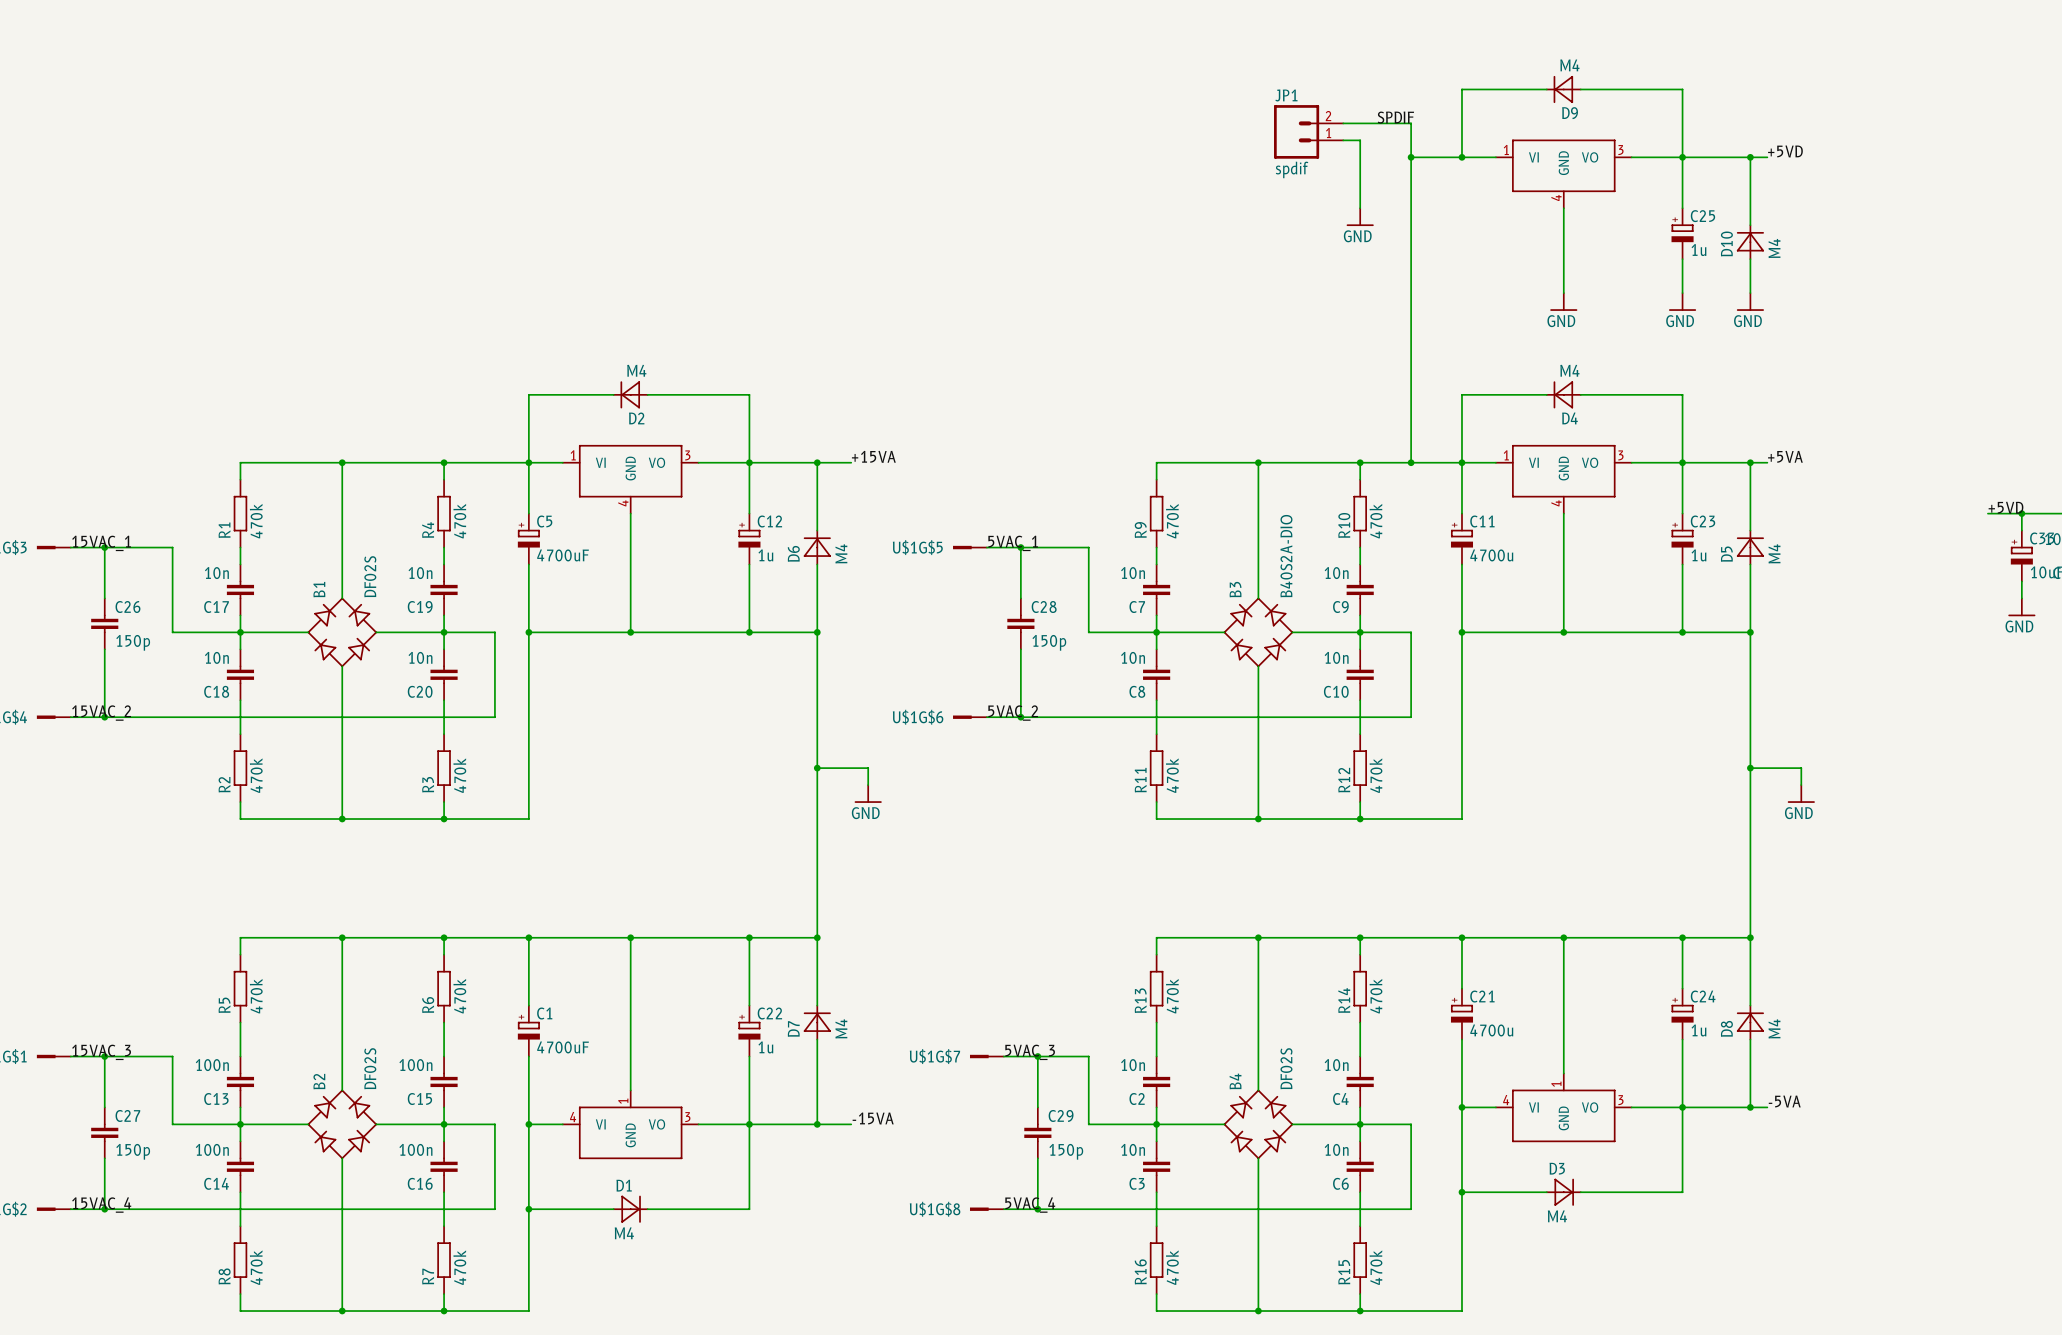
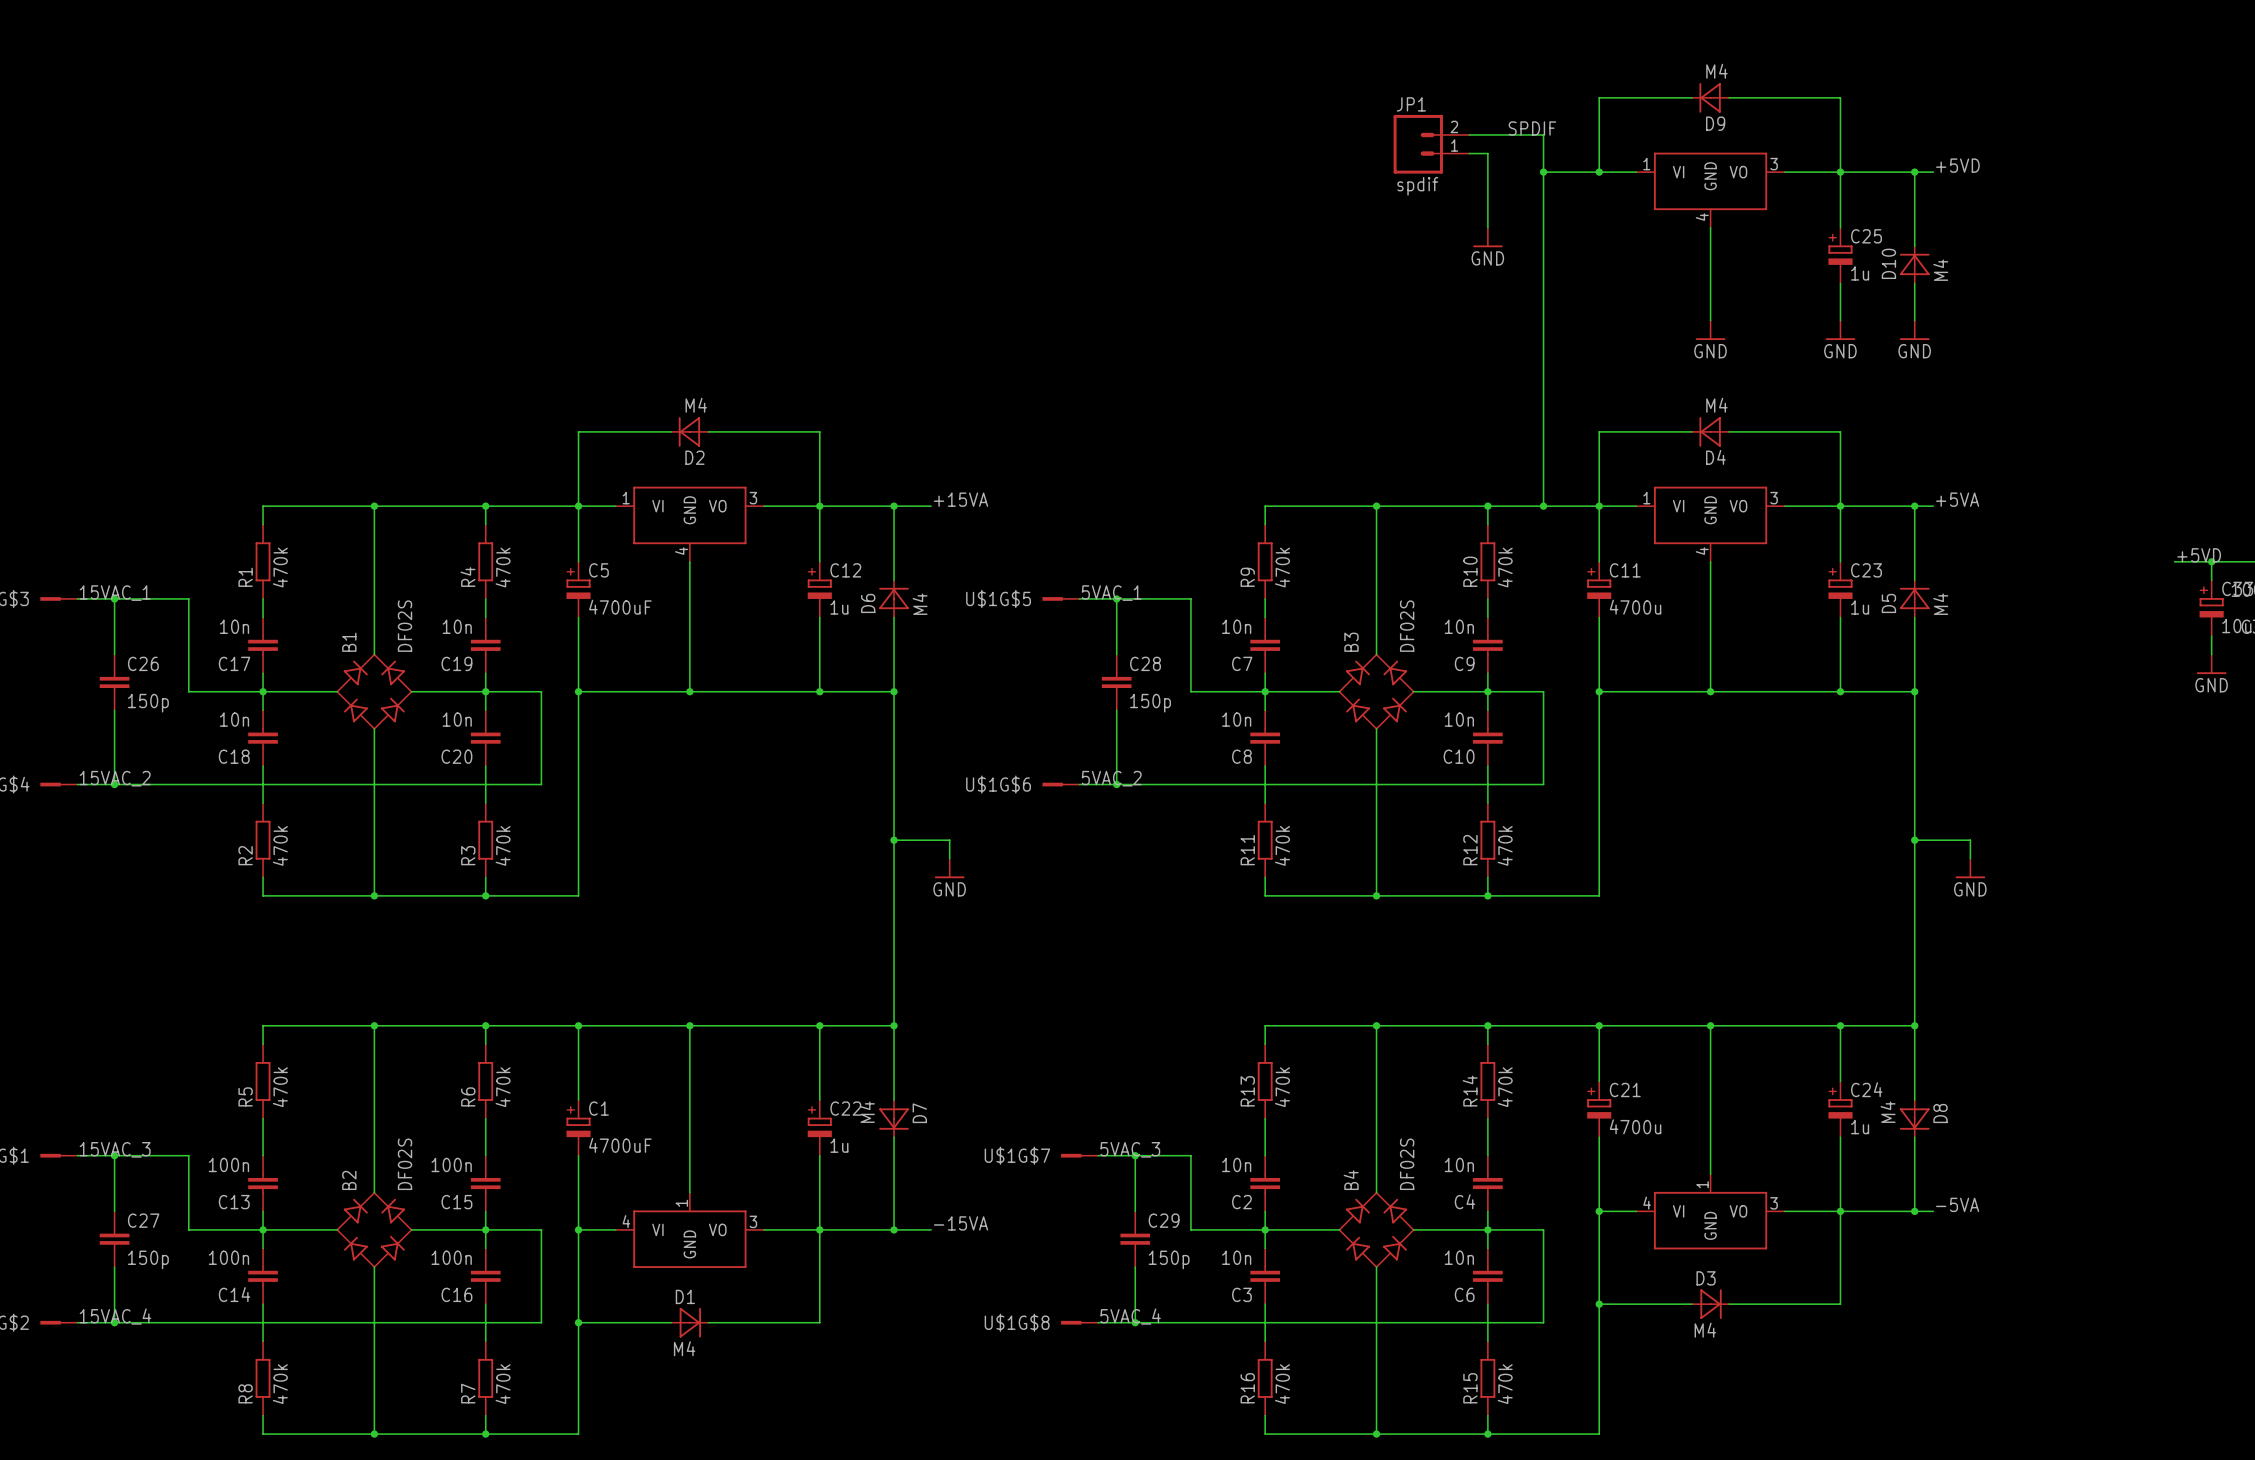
B3 value: B40S2A-DIO (1286, 556) -> DF02S (1407, 626)
D7 rotation: 0° (817, 1022) -> 180° (894, 1119)
D8 rotation: 0° (1750, 1022) -> 180° (1914, 1119)

